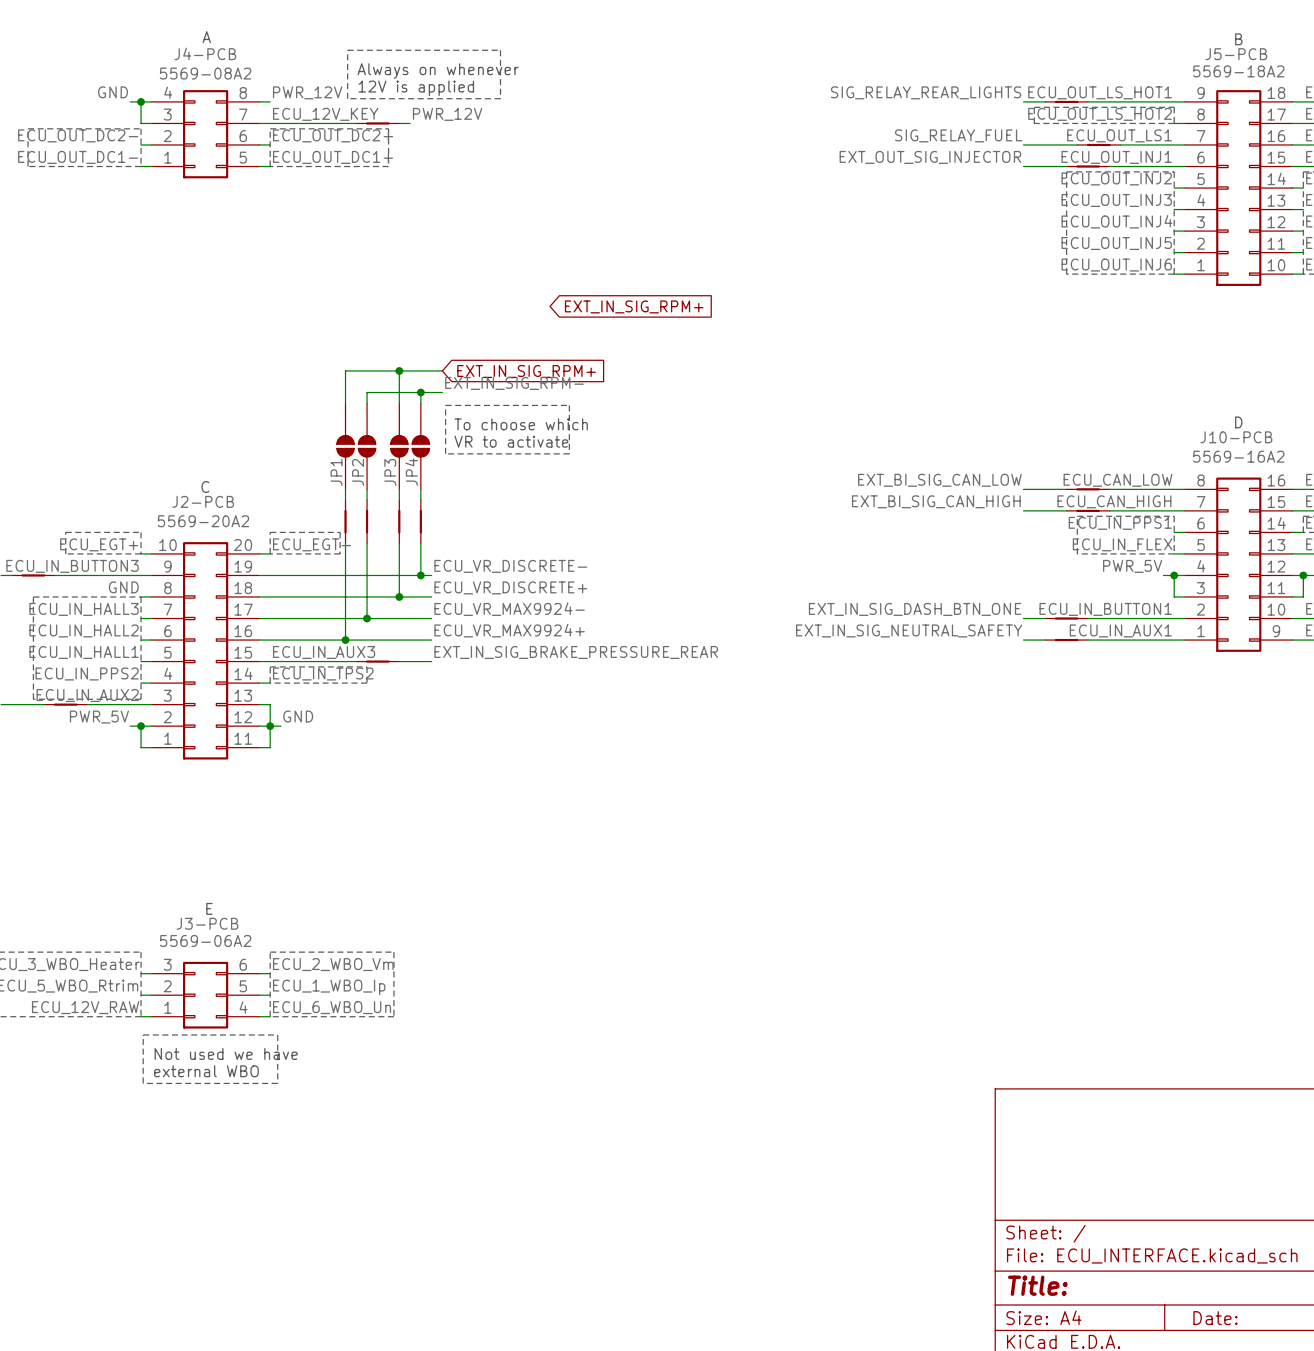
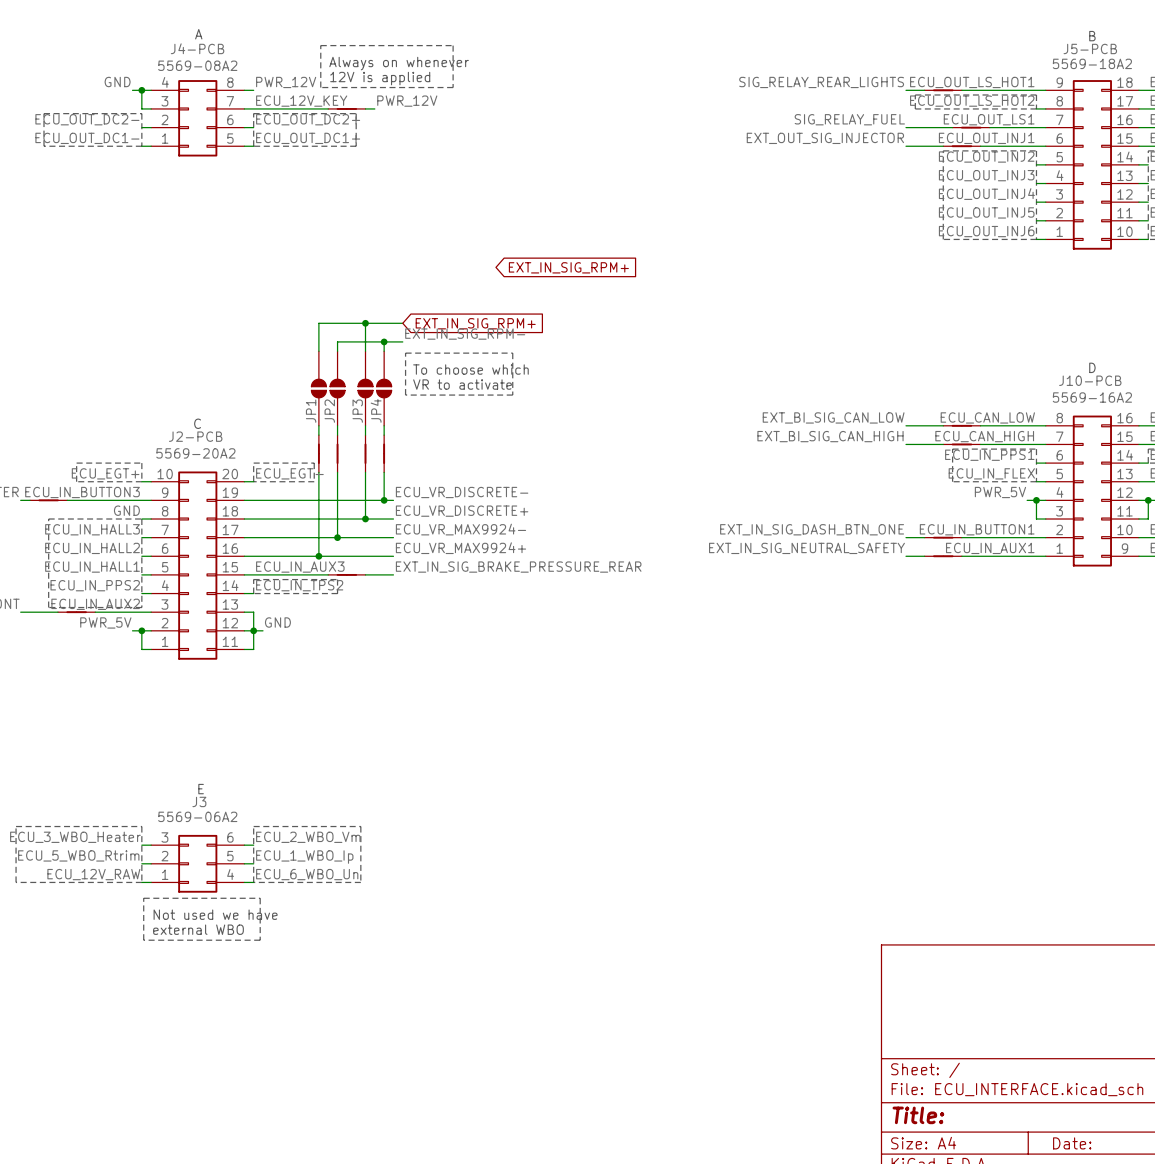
J3-PCB name: J3-PCB (207, 923) -> J3 (199, 801)

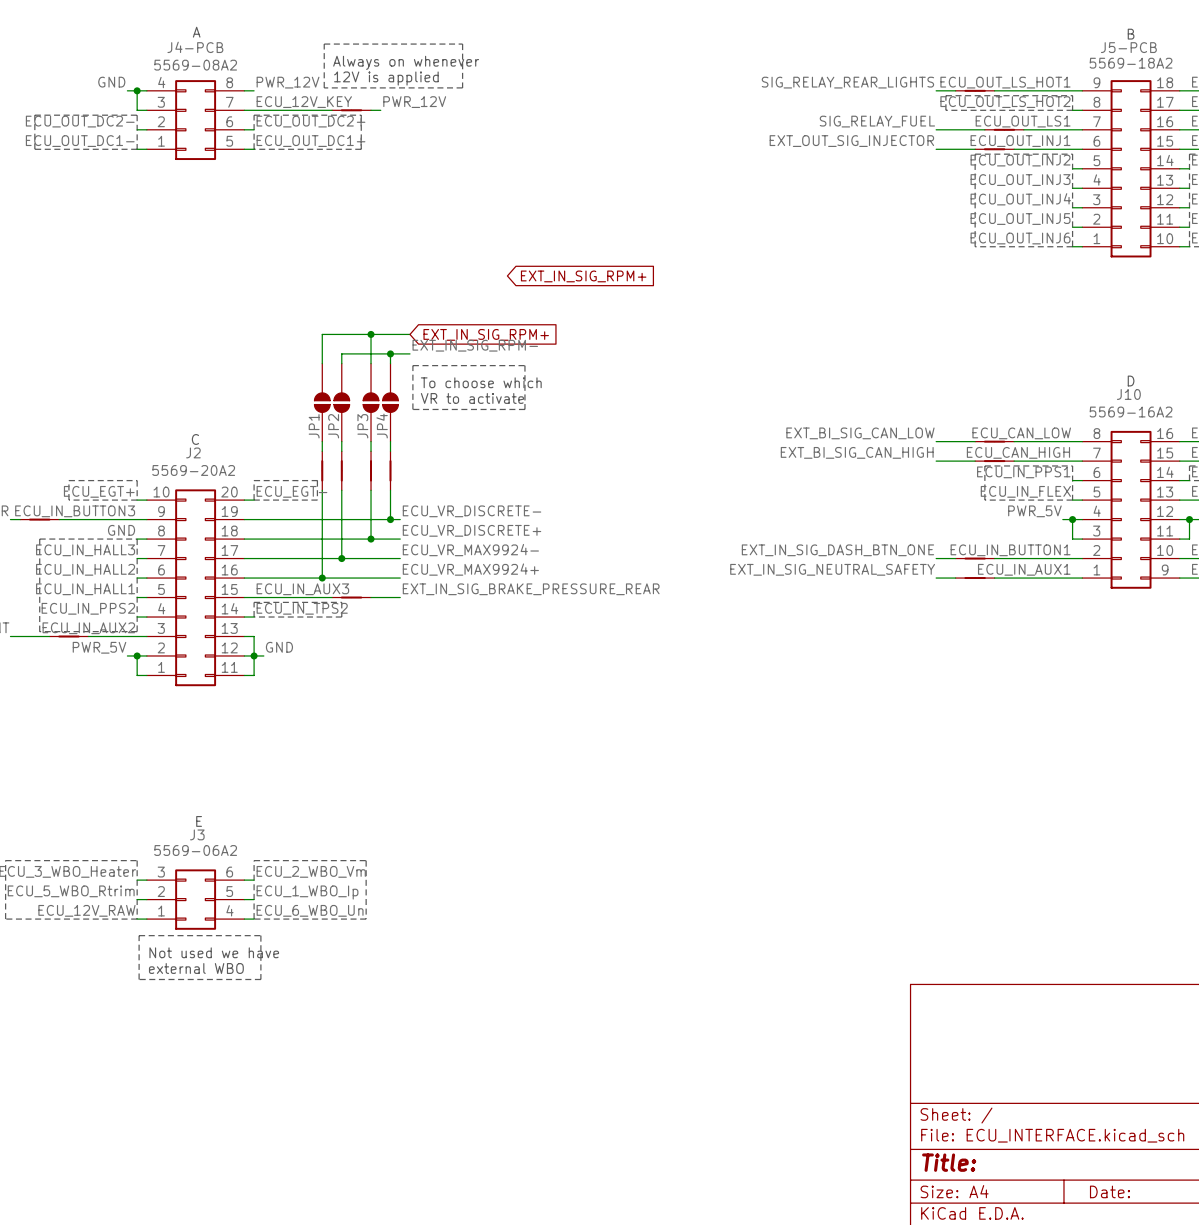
J10-PCB name: J10-PCB (1090, 380) -> J10 (1128, 394)
J2-PCB name: J2-PCB (195, 436) -> J2 (193, 452)

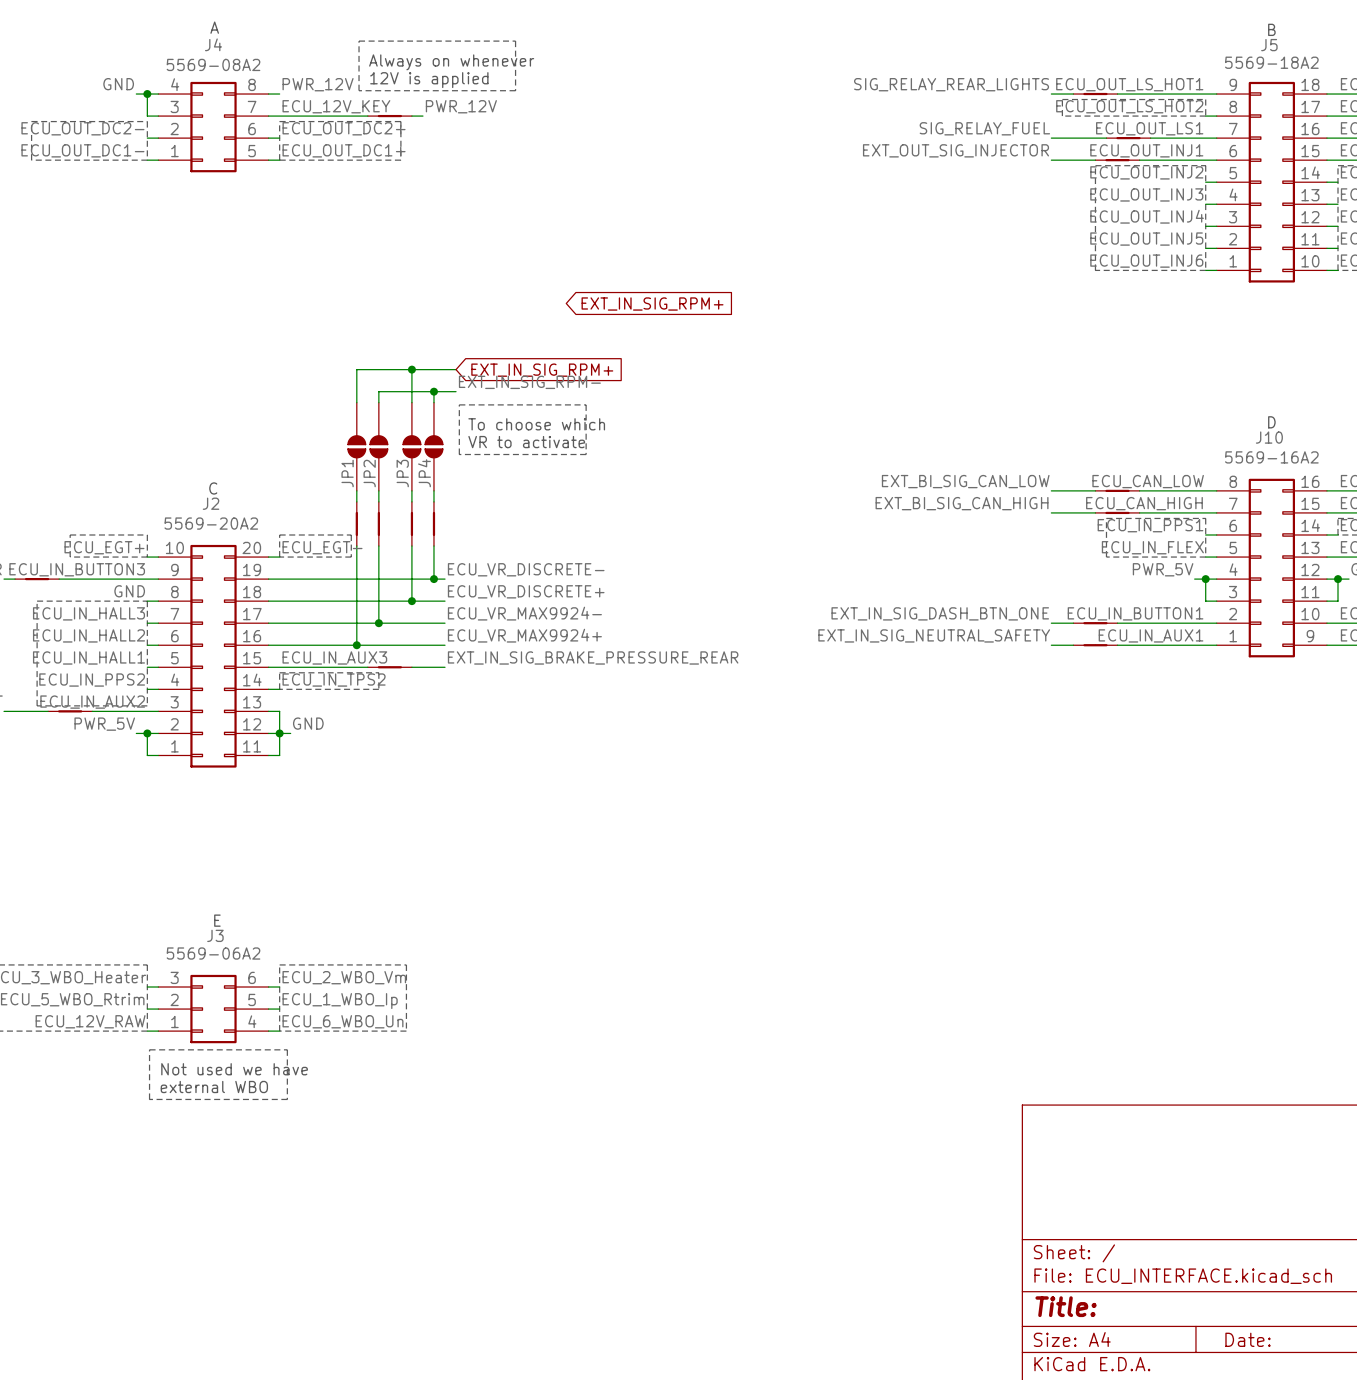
J4-PCB name: J4-PCB (195, 47) -> J4 (213, 44)
J5-PCB name: J5-PCB (1128, 47) -> J5 (1269, 45)

